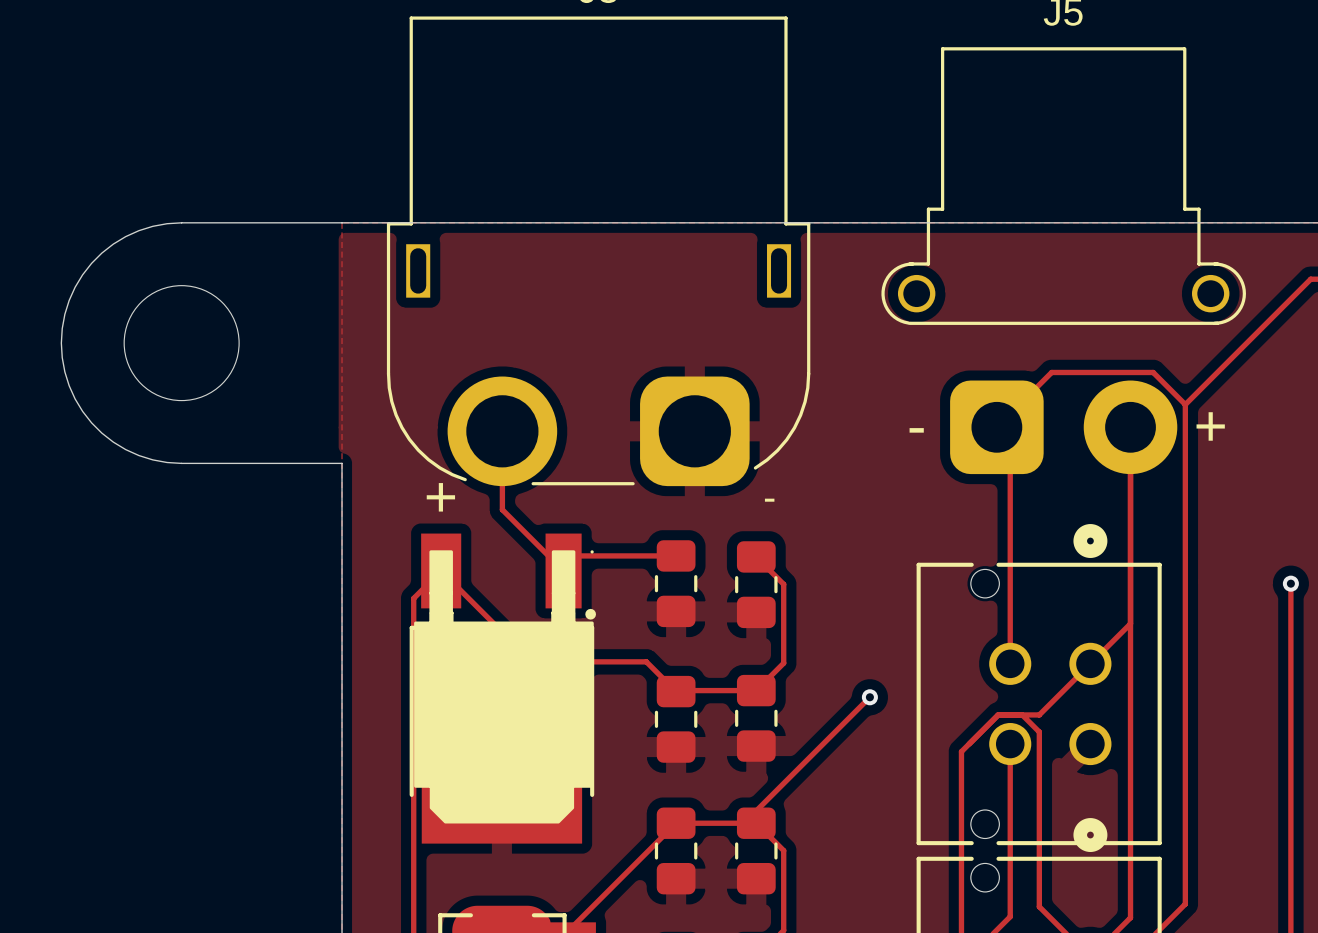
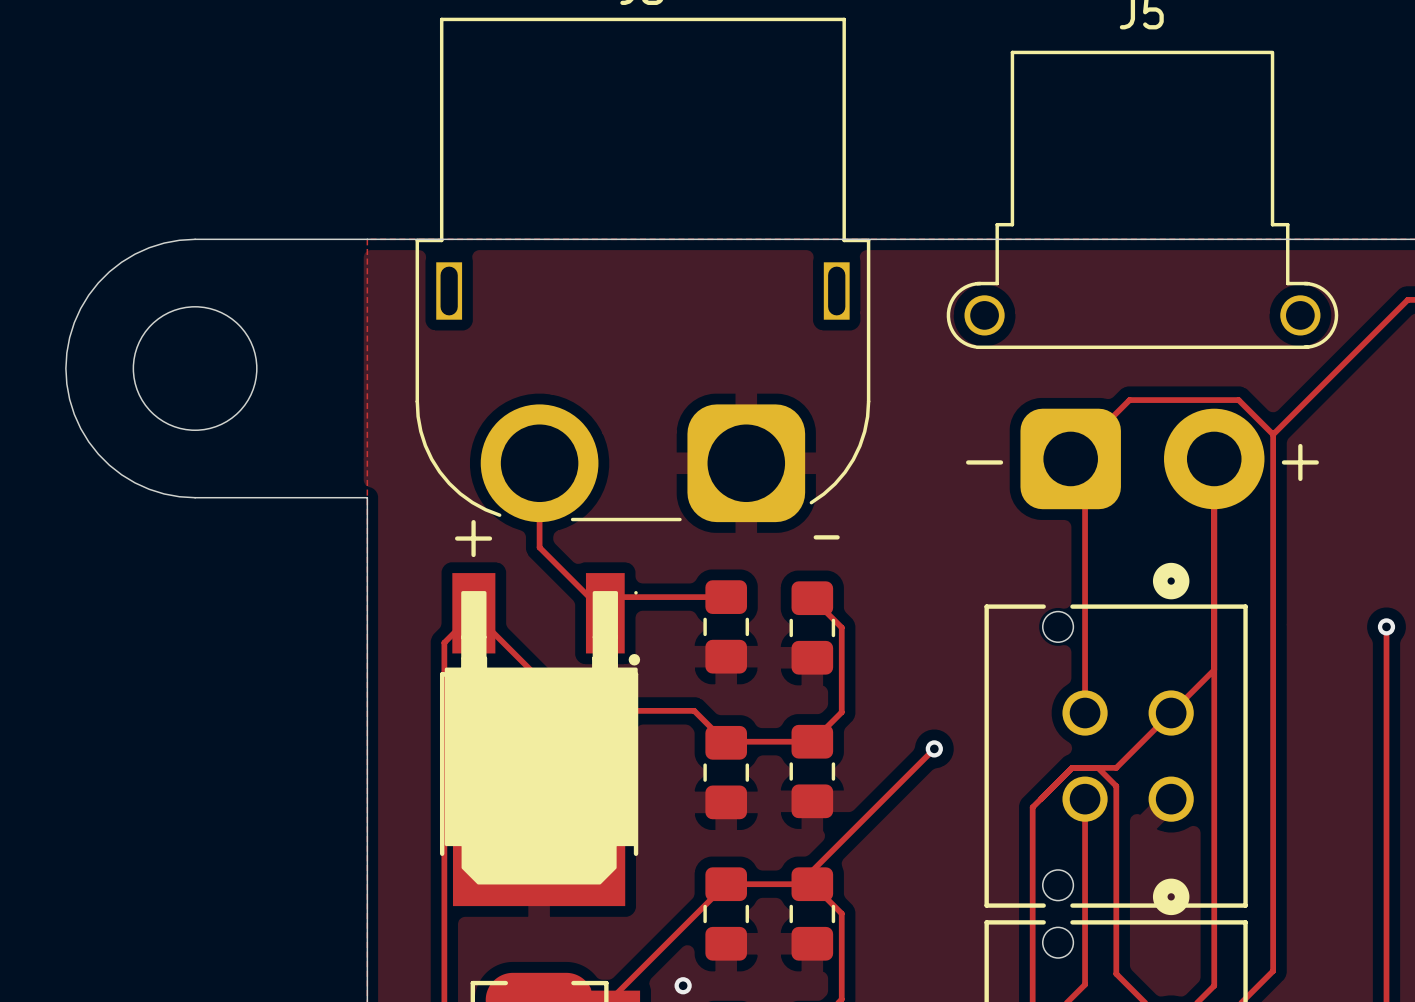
via: none -> (683, 985)

